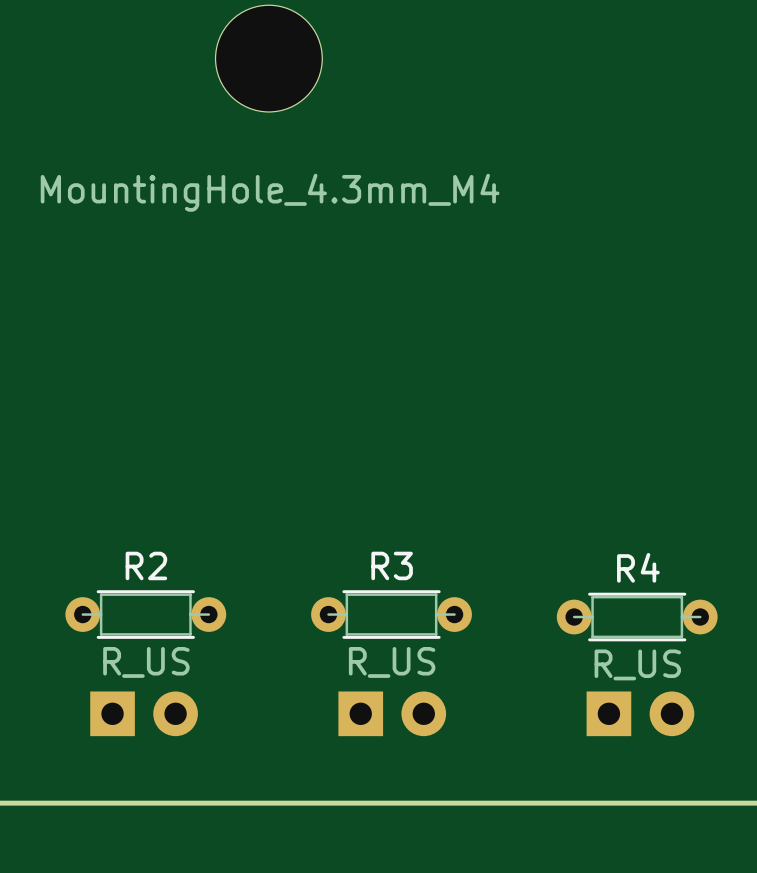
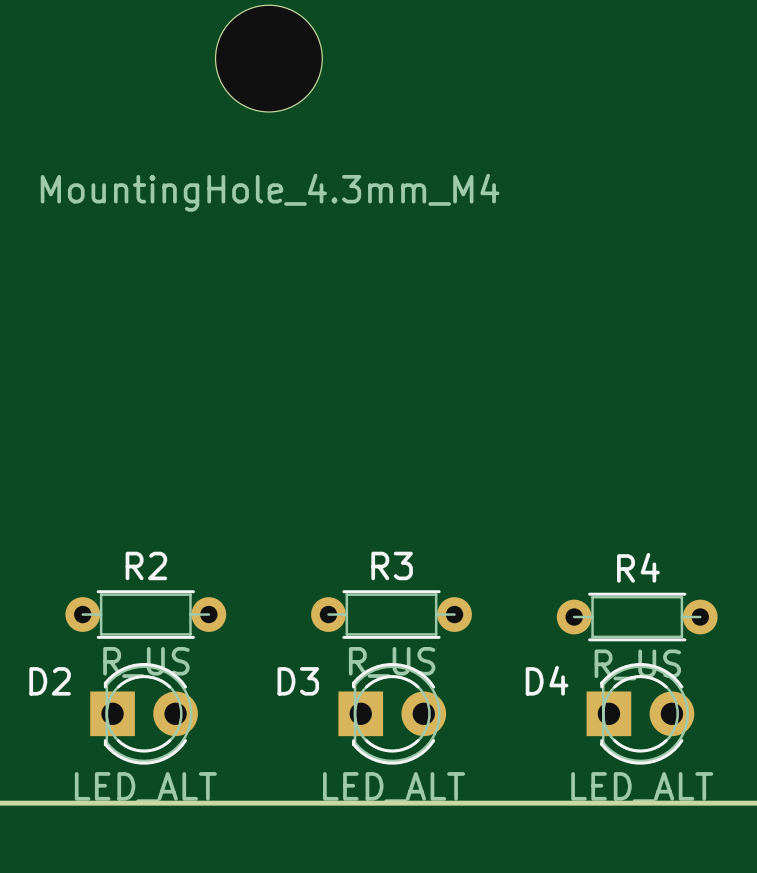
D2 side: bottom (144, 713) -> top (144, 713)
D3 side: bottom (392, 713) -> top (392, 713)
D4 side: bottom (640, 713) -> top (640, 713)

